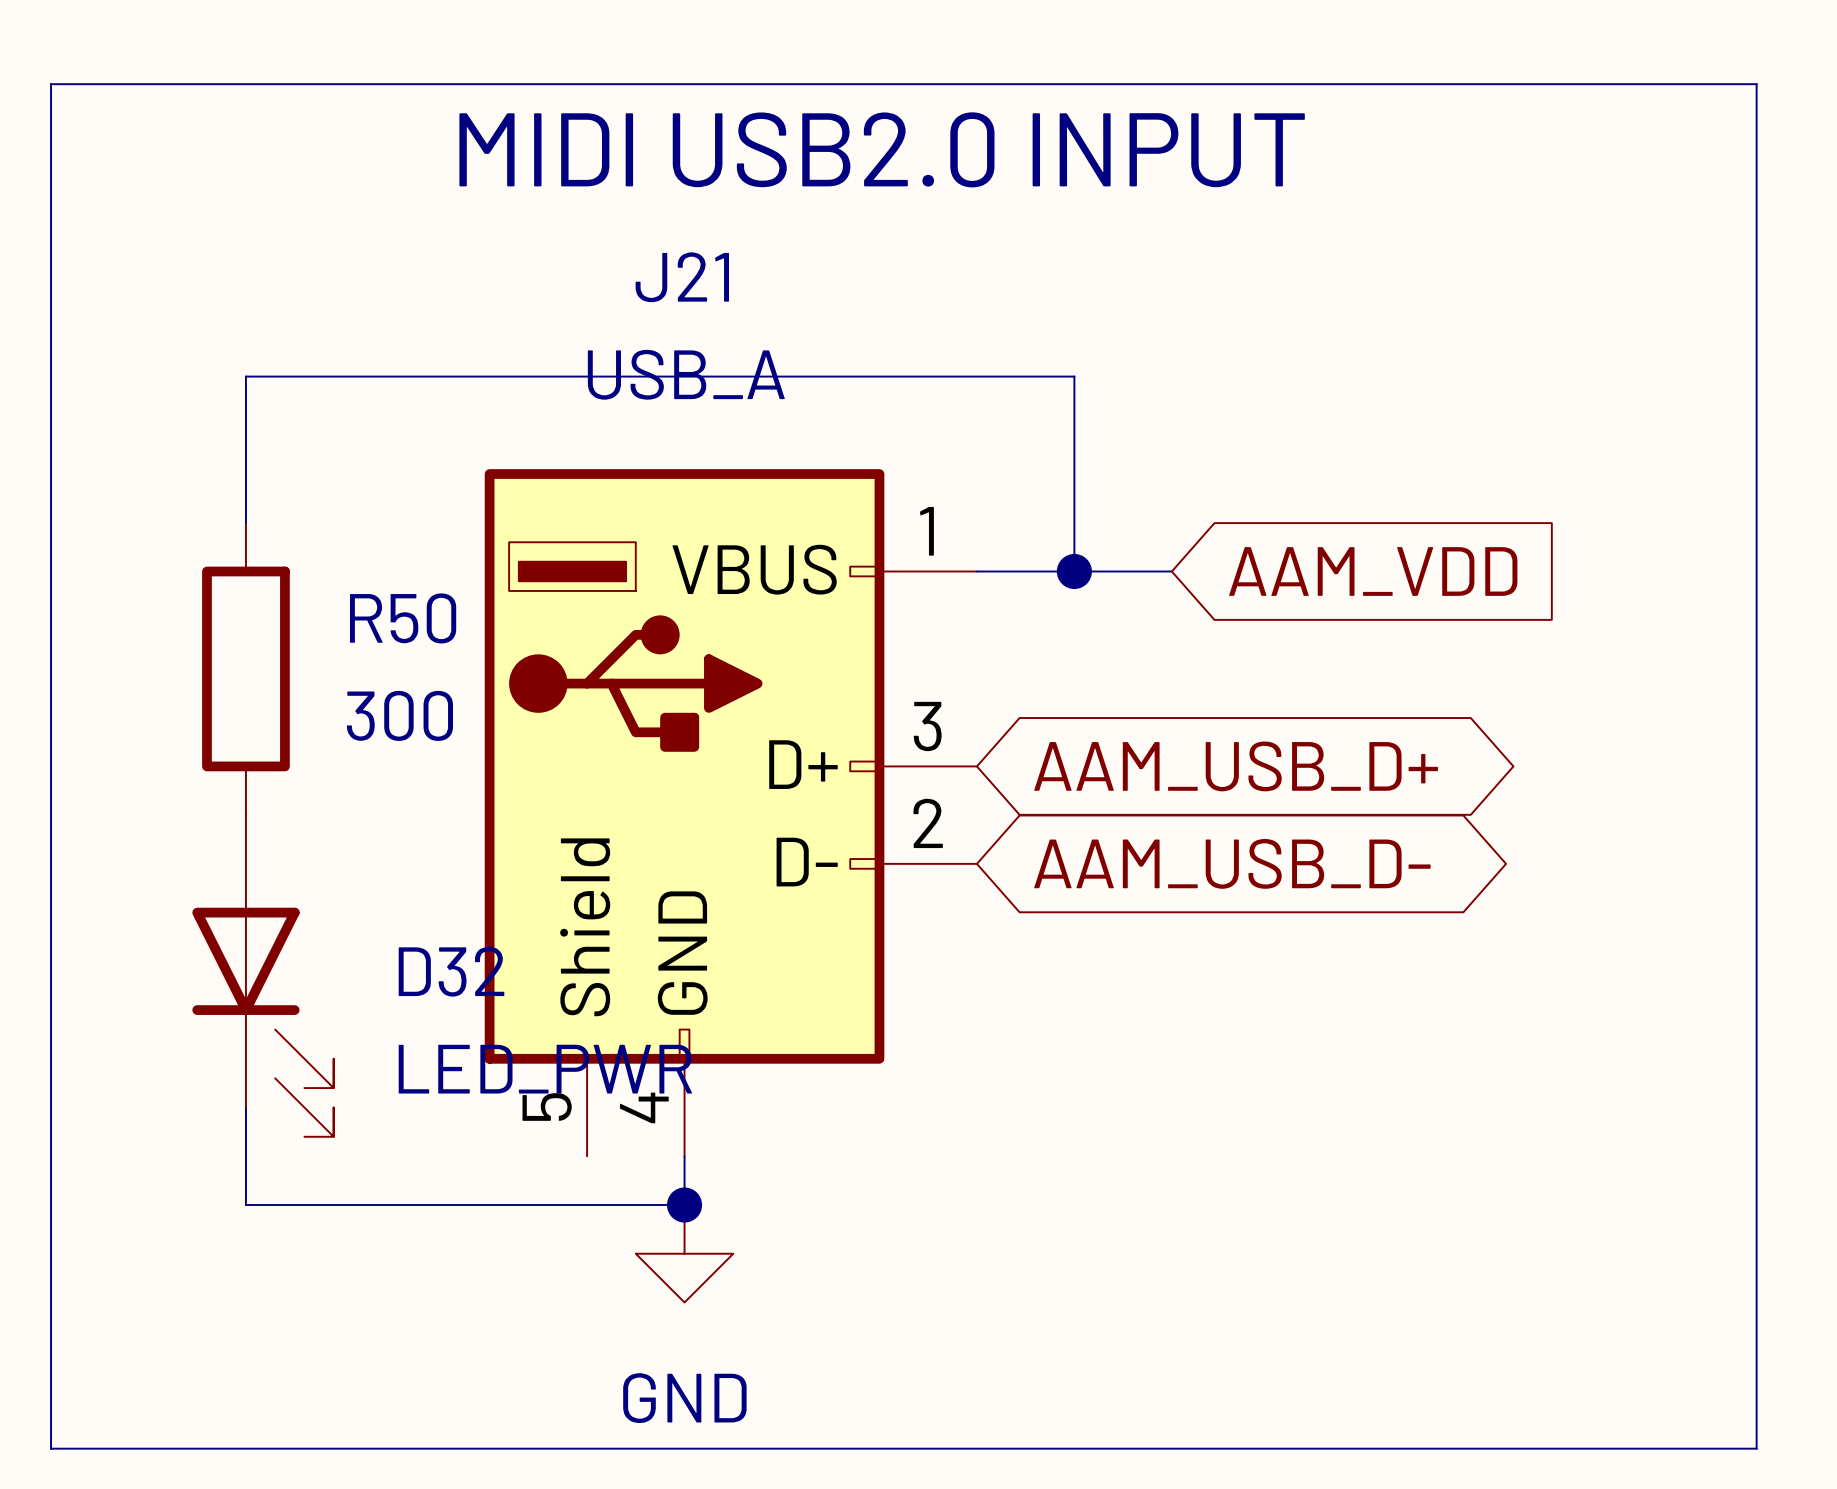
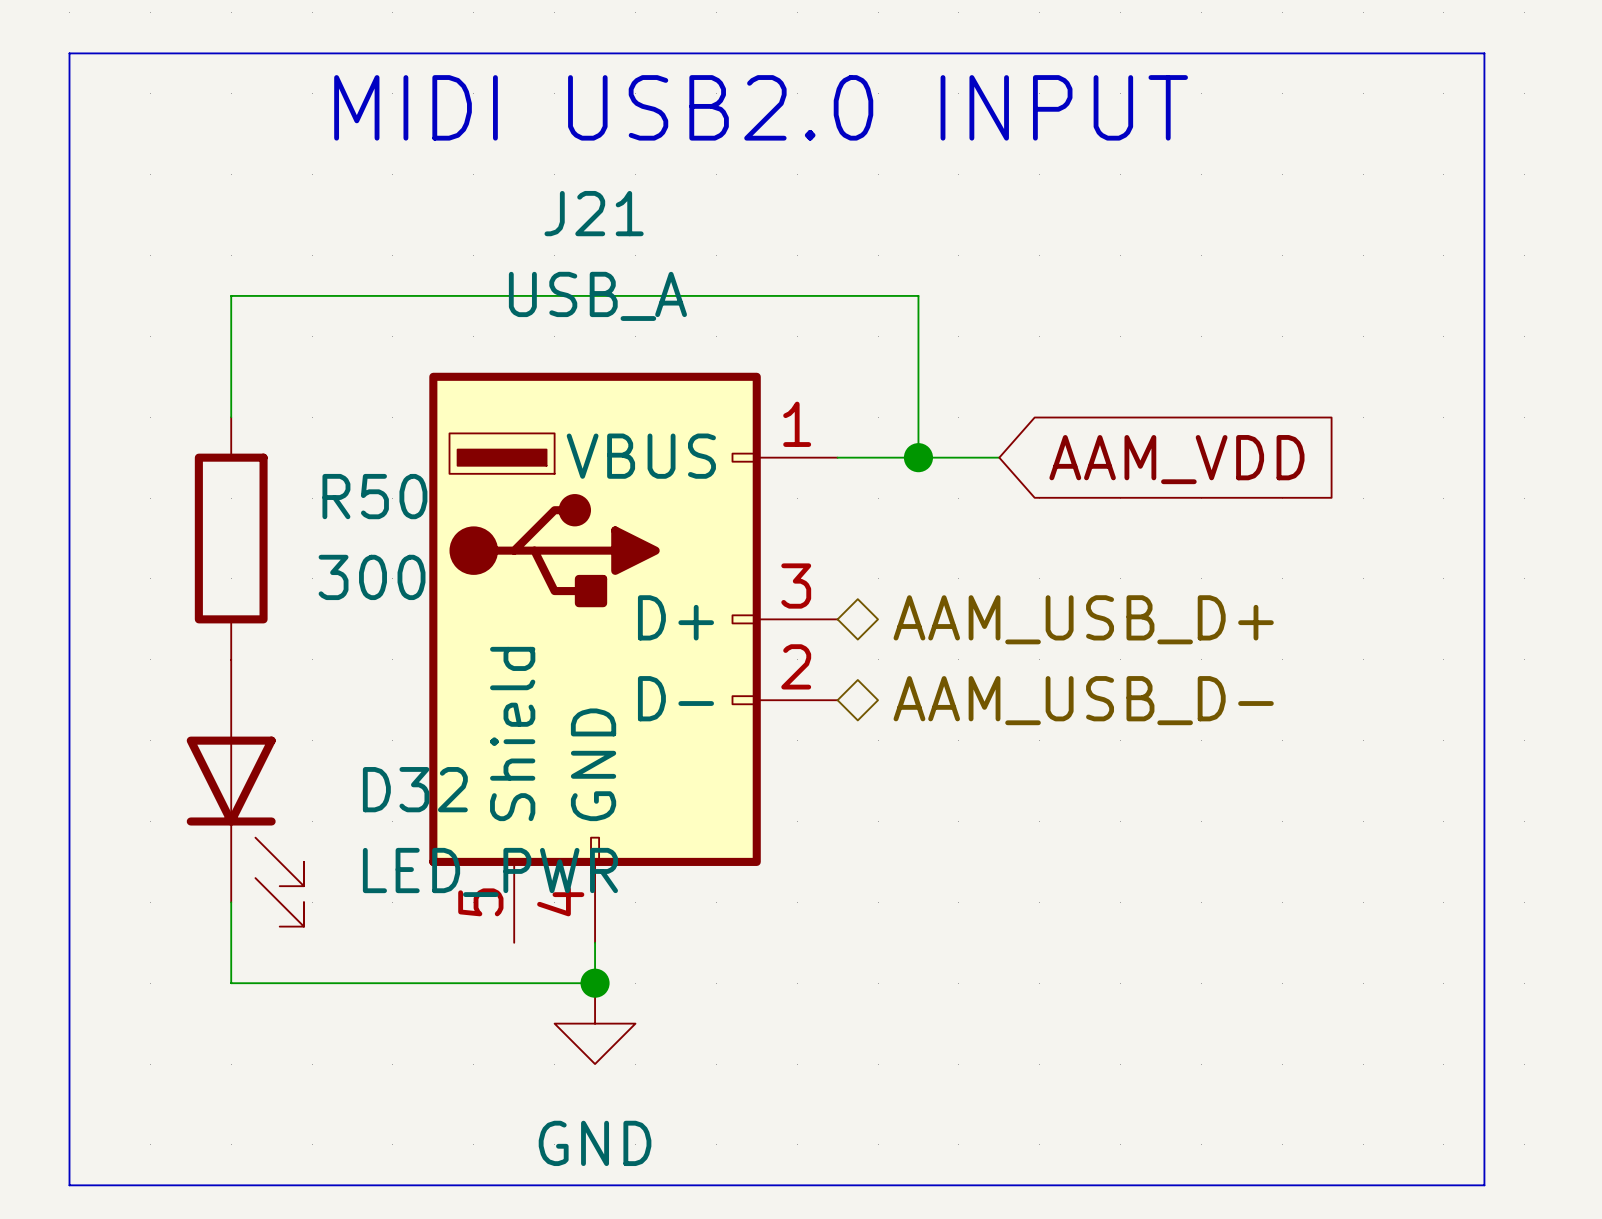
hierarchical label: none -> AAM_USB_D+ (1083, 619)
global label: AAM_USB_D+ (1236, 766) -> none
hierarchical label: none -> AAM_USB_D- (1083, 700)
global label: AAM_USB_D- (1232, 863) -> none

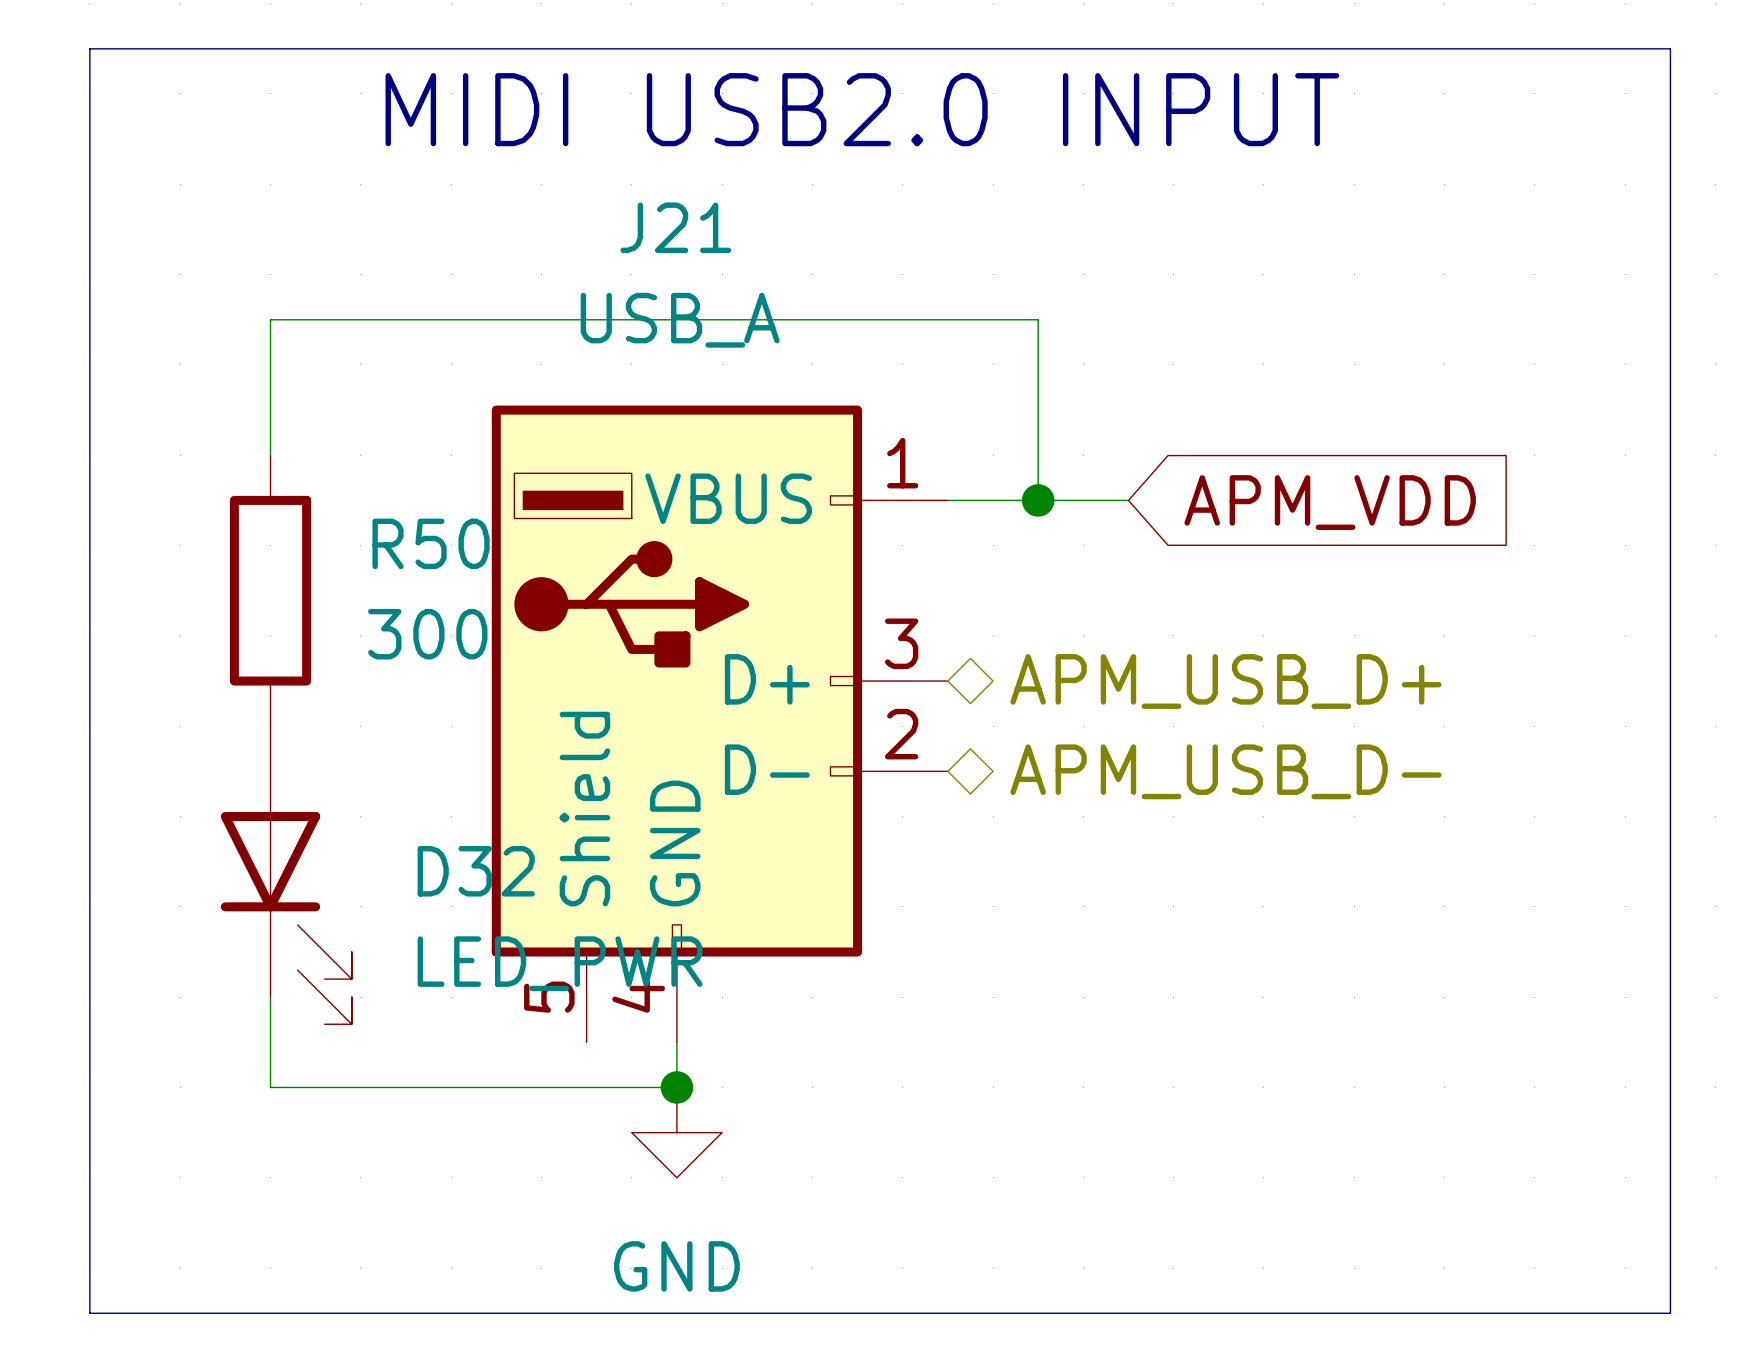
global label: AAM_VDD (1176, 459) -> APM_VDD (1330, 502)
hierarchical label: AAM_USB_D+ (1083, 619) -> APM_USB_D+ (1225, 681)
hierarchical label: AAM_USB_D- (1083, 700) -> APM_USB_D- (1225, 771)

